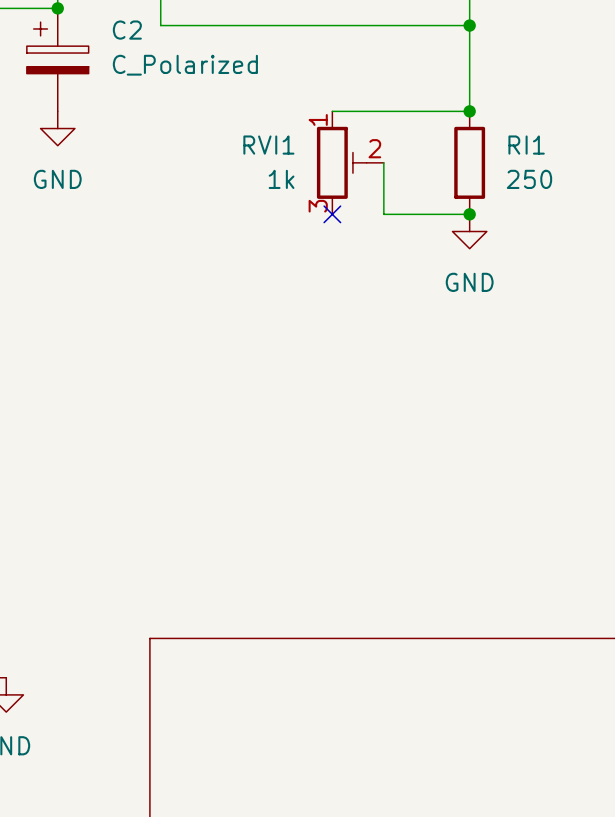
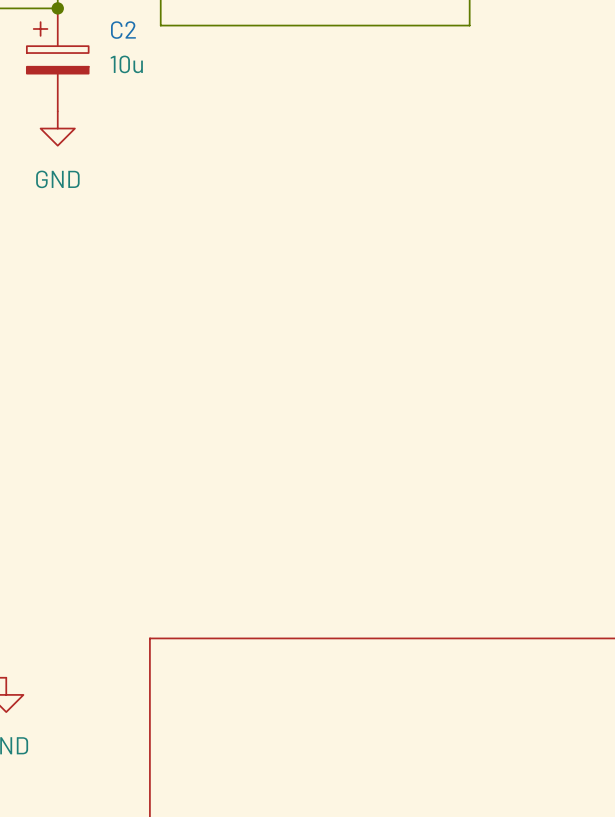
wire: (469, 25) (469, 111) (332, 111) -> none
junction: (469, 25) -> none
C2 value: C_Polarized (185, 65) -> 10u (126, 64)
junction: (469, 111) -> none
RVI1: 1k (350, 162) -> none
wire: (383, 162) (383, 214) (469, 214) -> none
RI1: 250 (469, 162) -> none
no-connect mark: (332, 214) -> none
junction: (469, 214) -> none
power symbol: GND (469, 231) -> none

